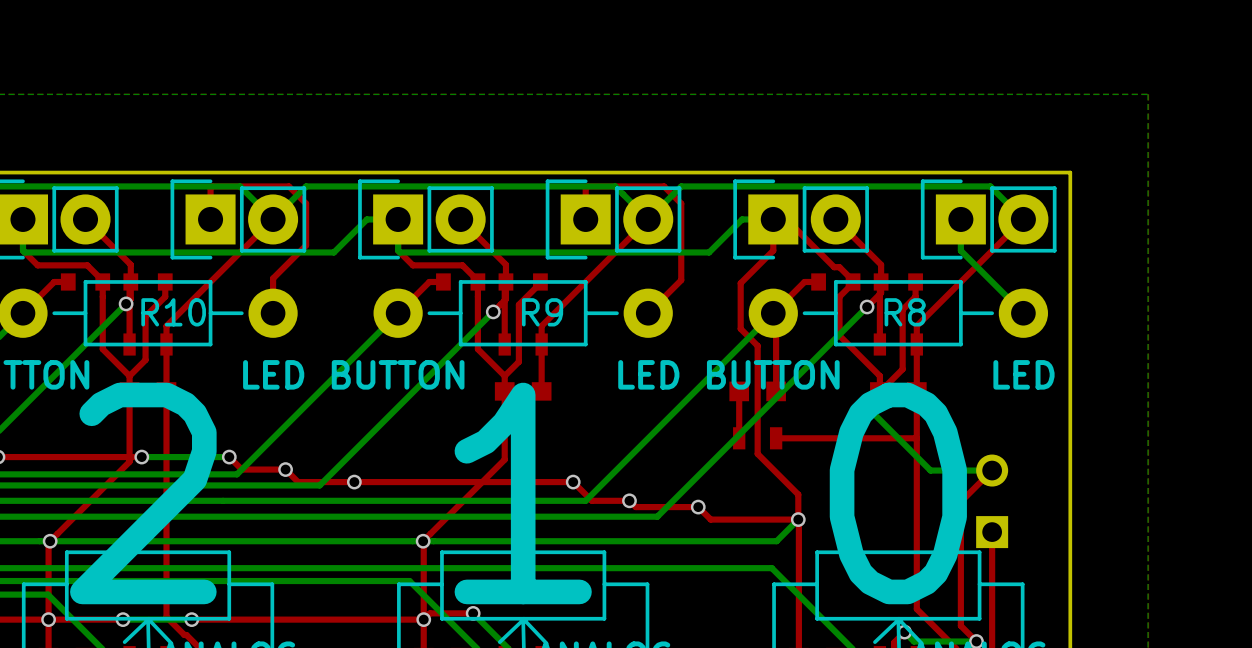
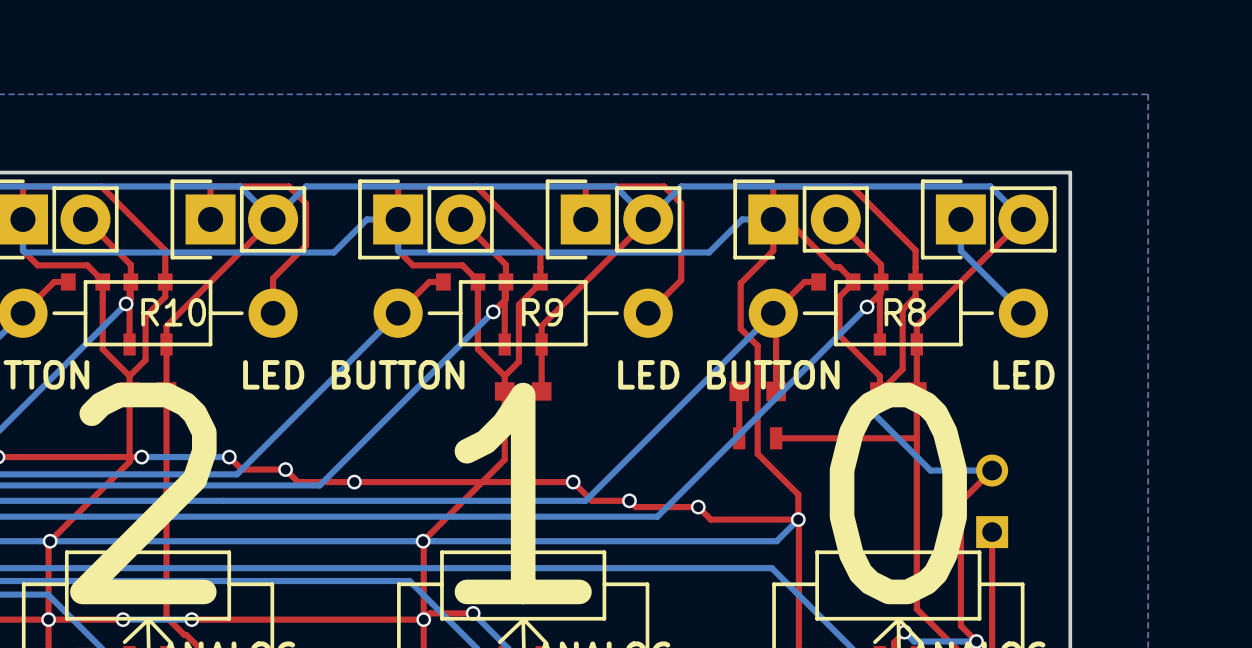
top track: none -> (22, 219) (22, 188) (24, 186) (101, 186) (165, 250) (165, 281)
top track: none -> (398, 219) (398, 188) (399, 186) (476, 186) (540, 250) (540, 281)
top track: none -> (773, 219) (773, 188) (775, 186) (851, 186) (915, 250) (915, 281)

